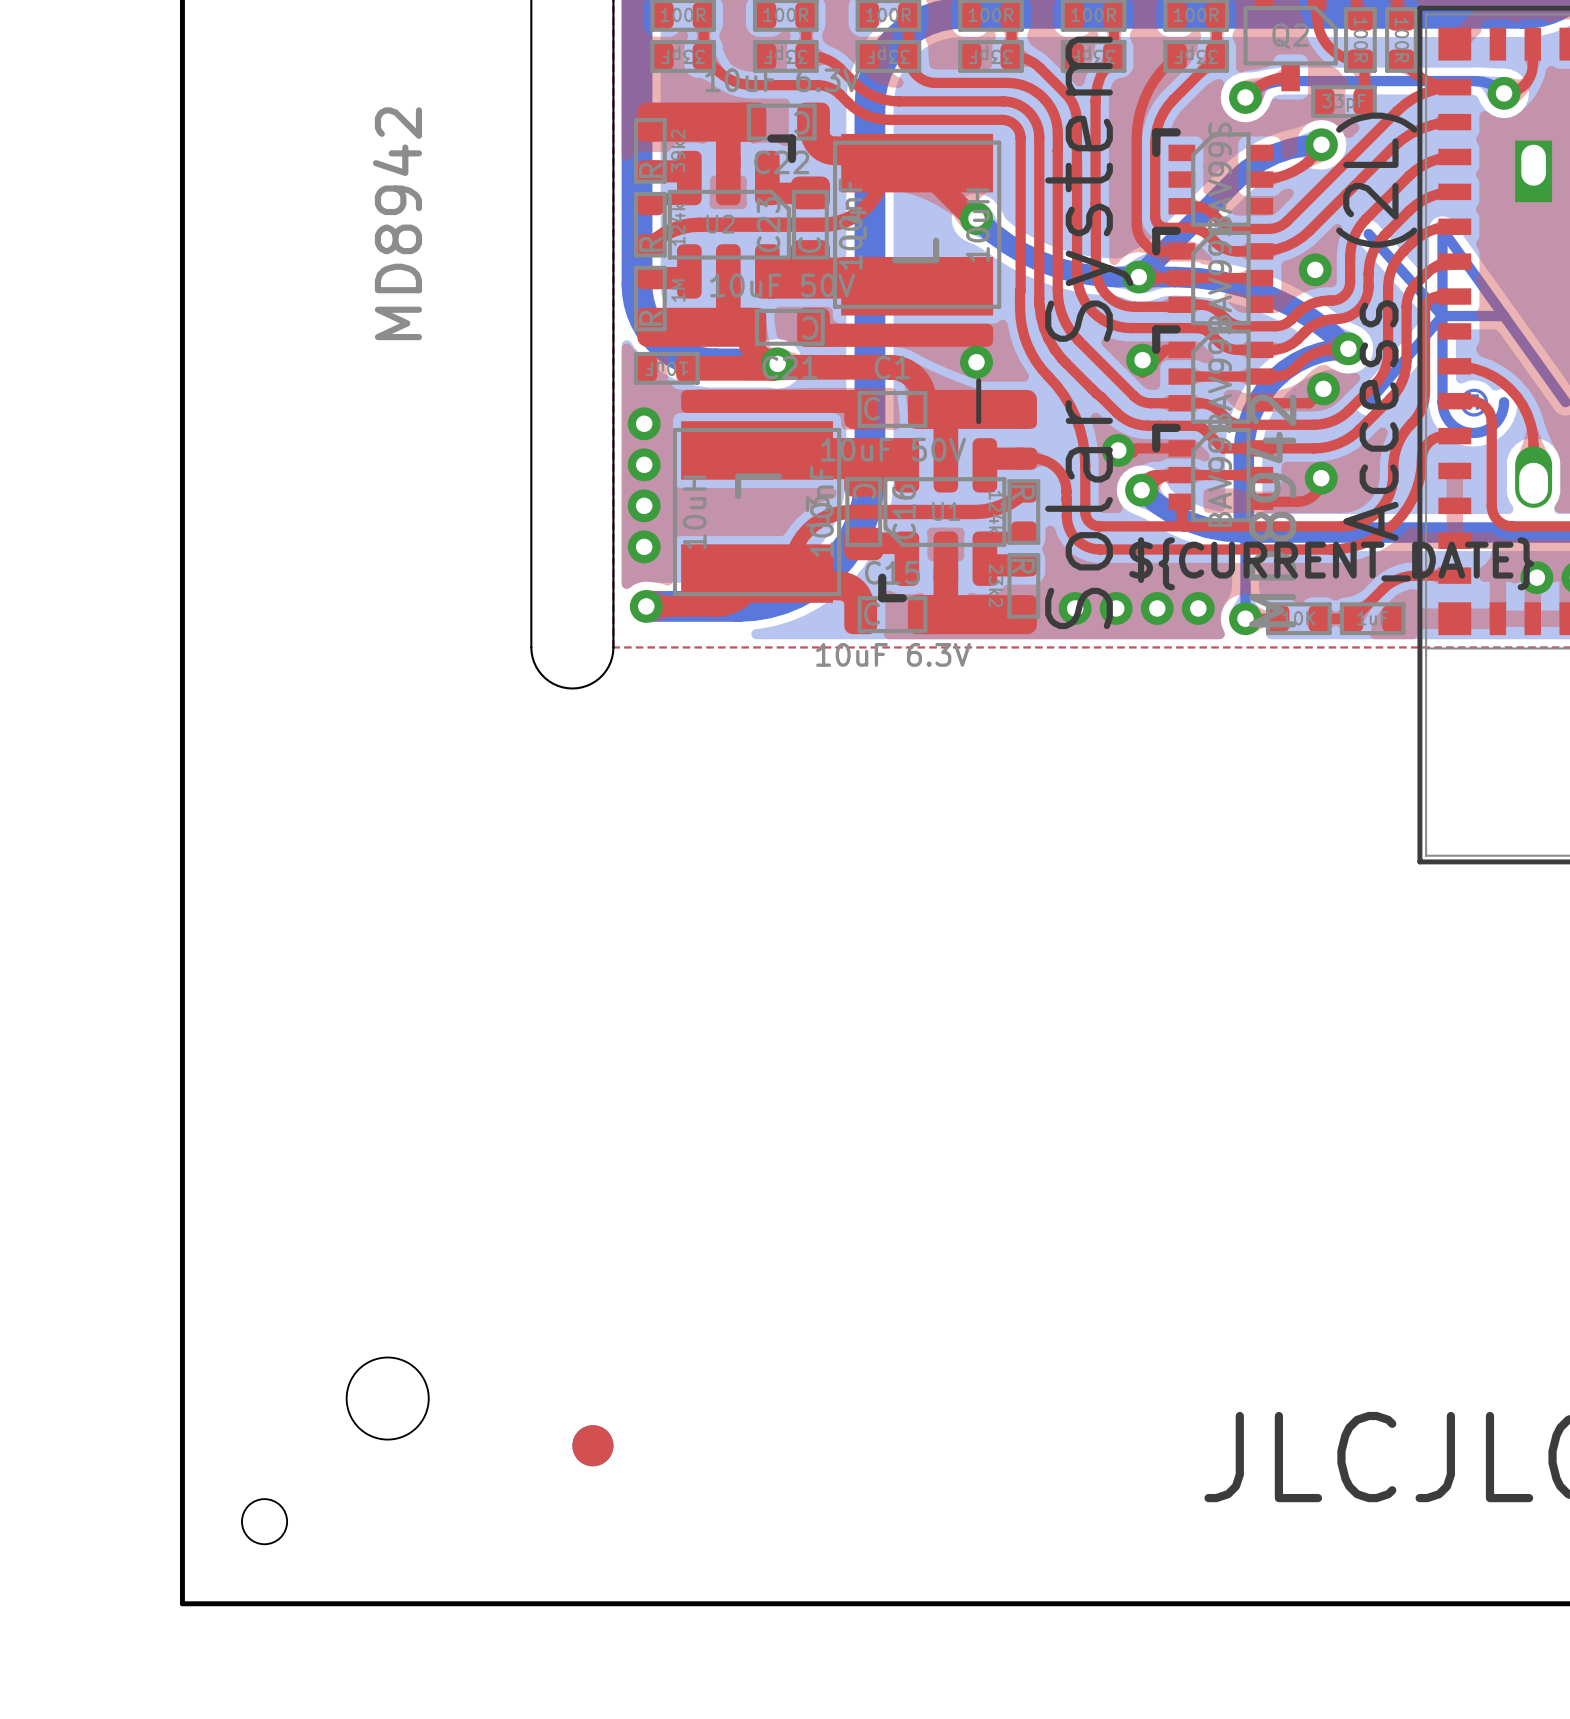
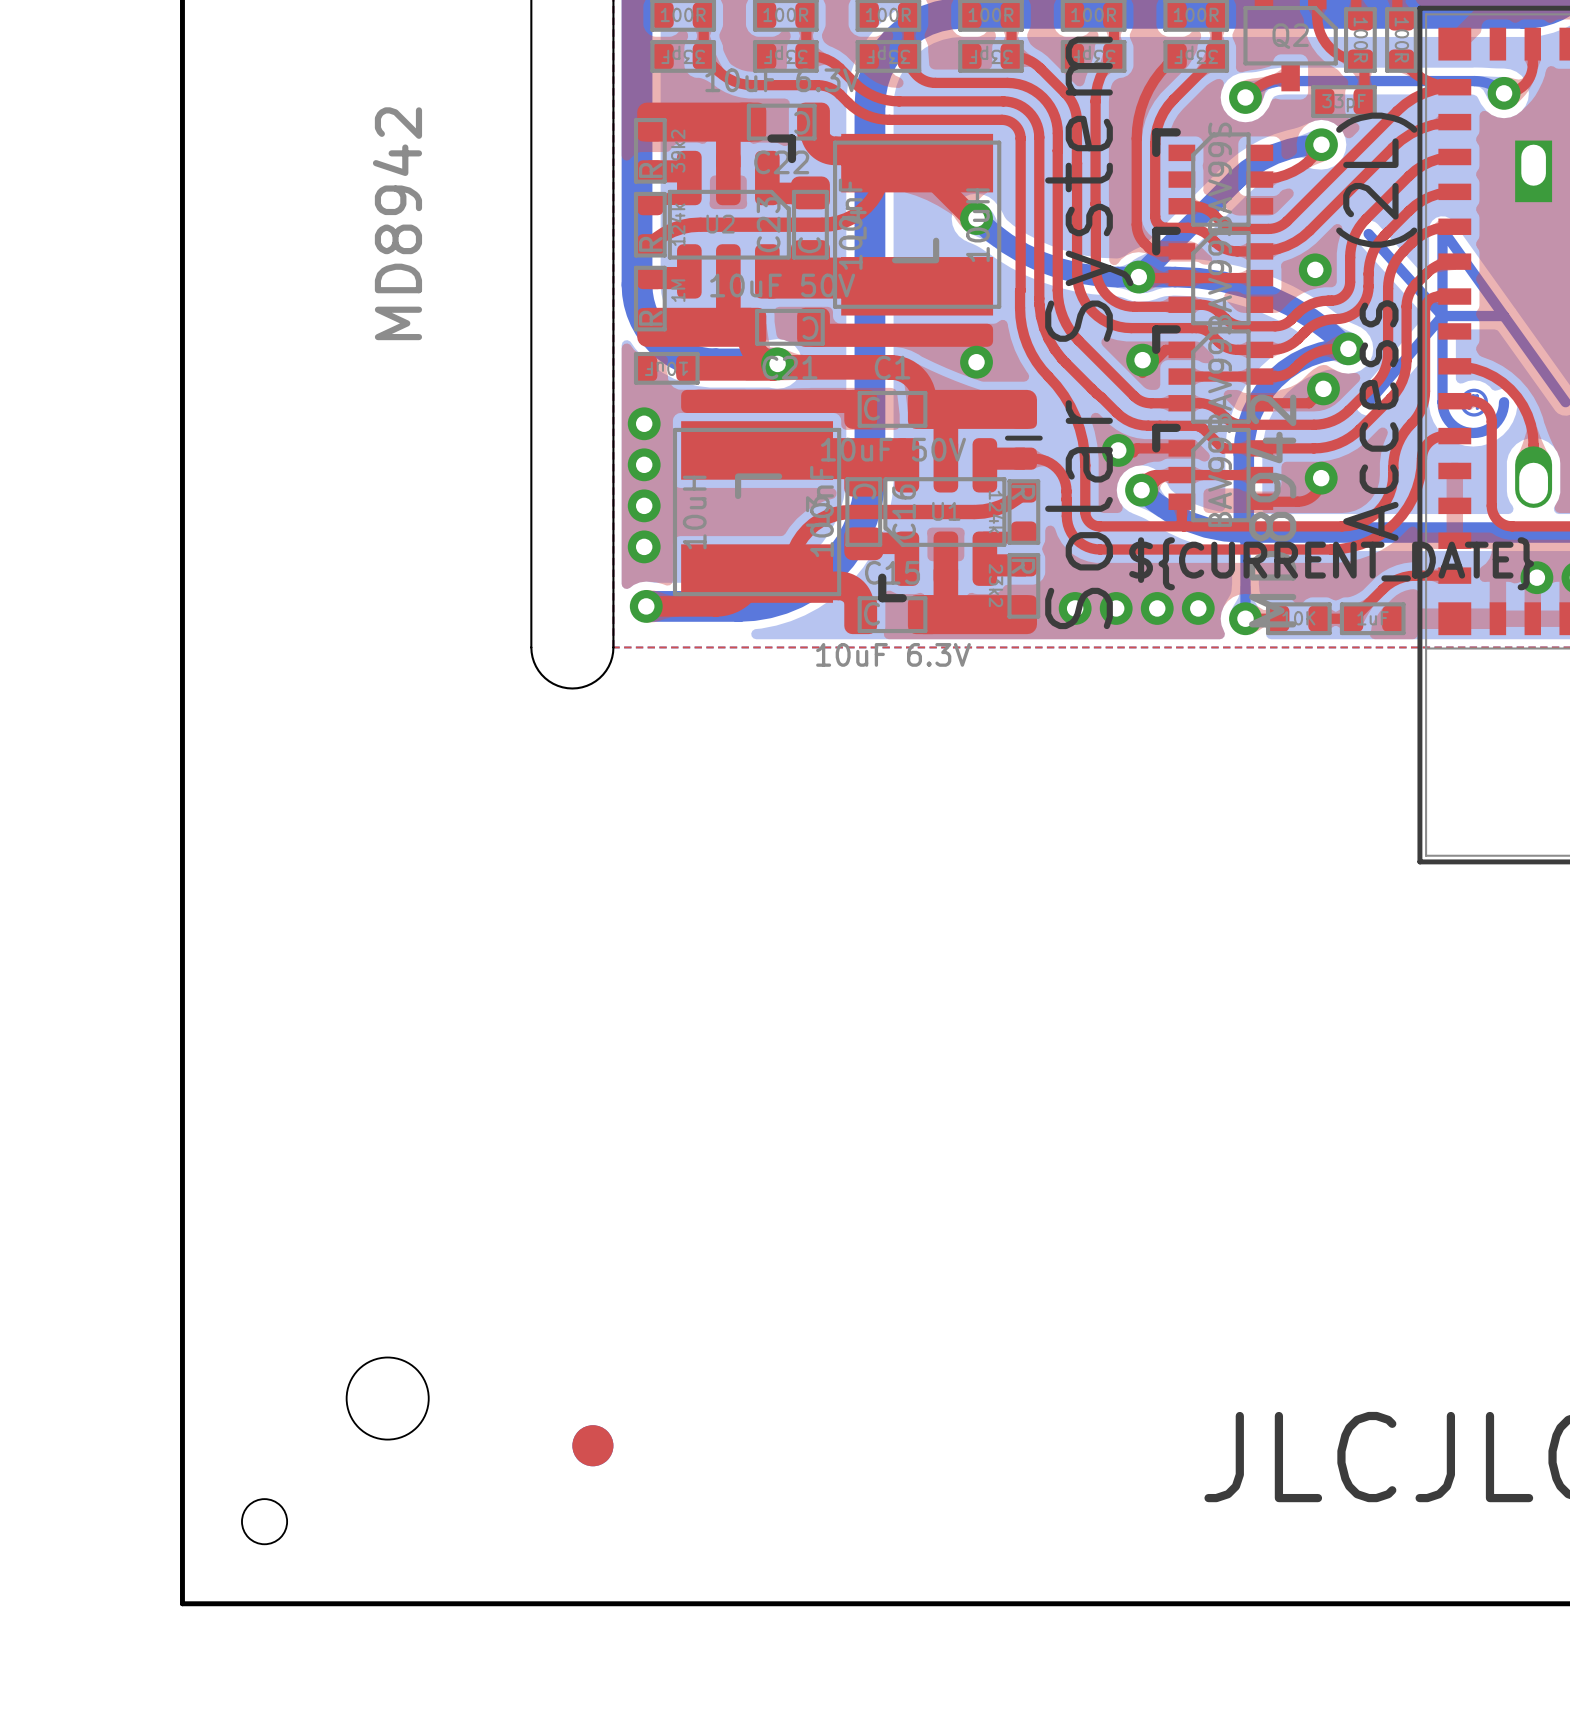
line: (978, 380) (978, 421) -> none
line: none -> (1007, 438) (1040, 438)

